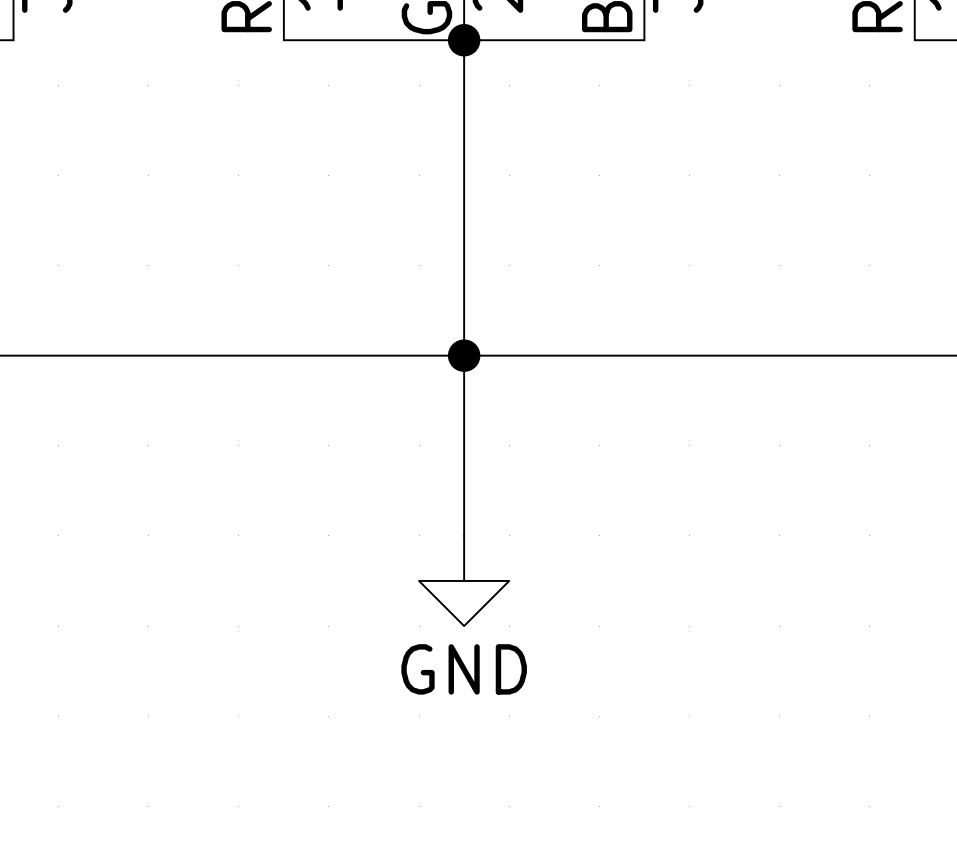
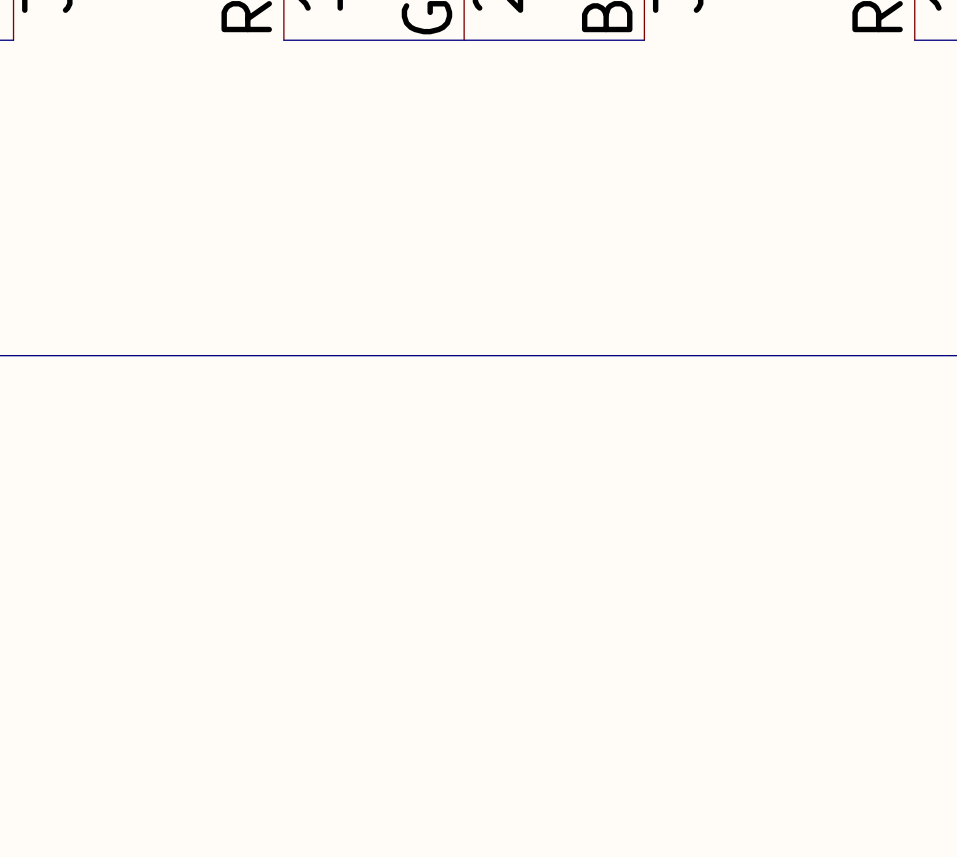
wire: (464, 40) (464, 535) -> none
junction: (464, 40) -> none
junction: (464, 355) -> none
power symbol: GND (464, 580) -> none

